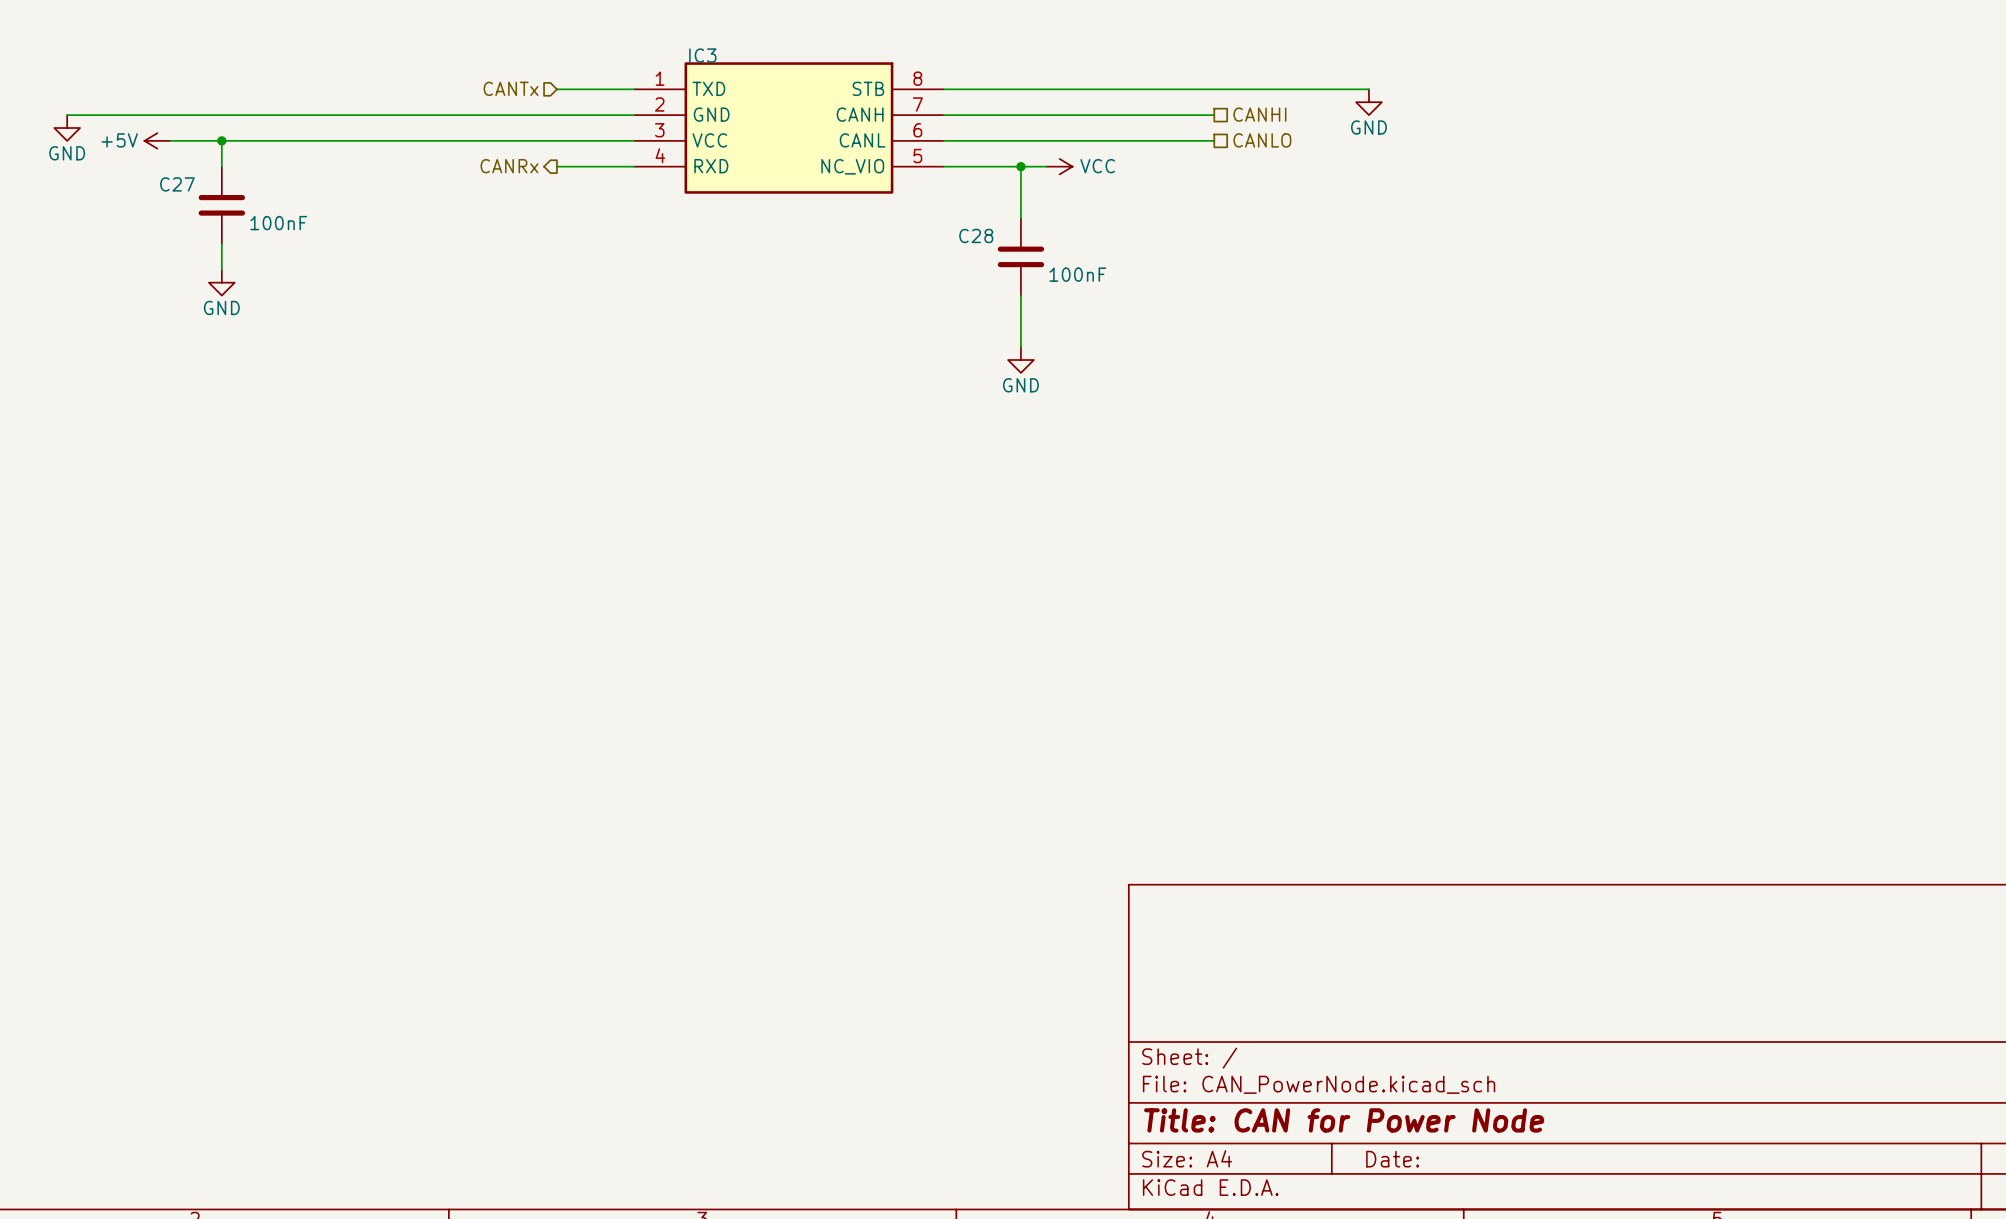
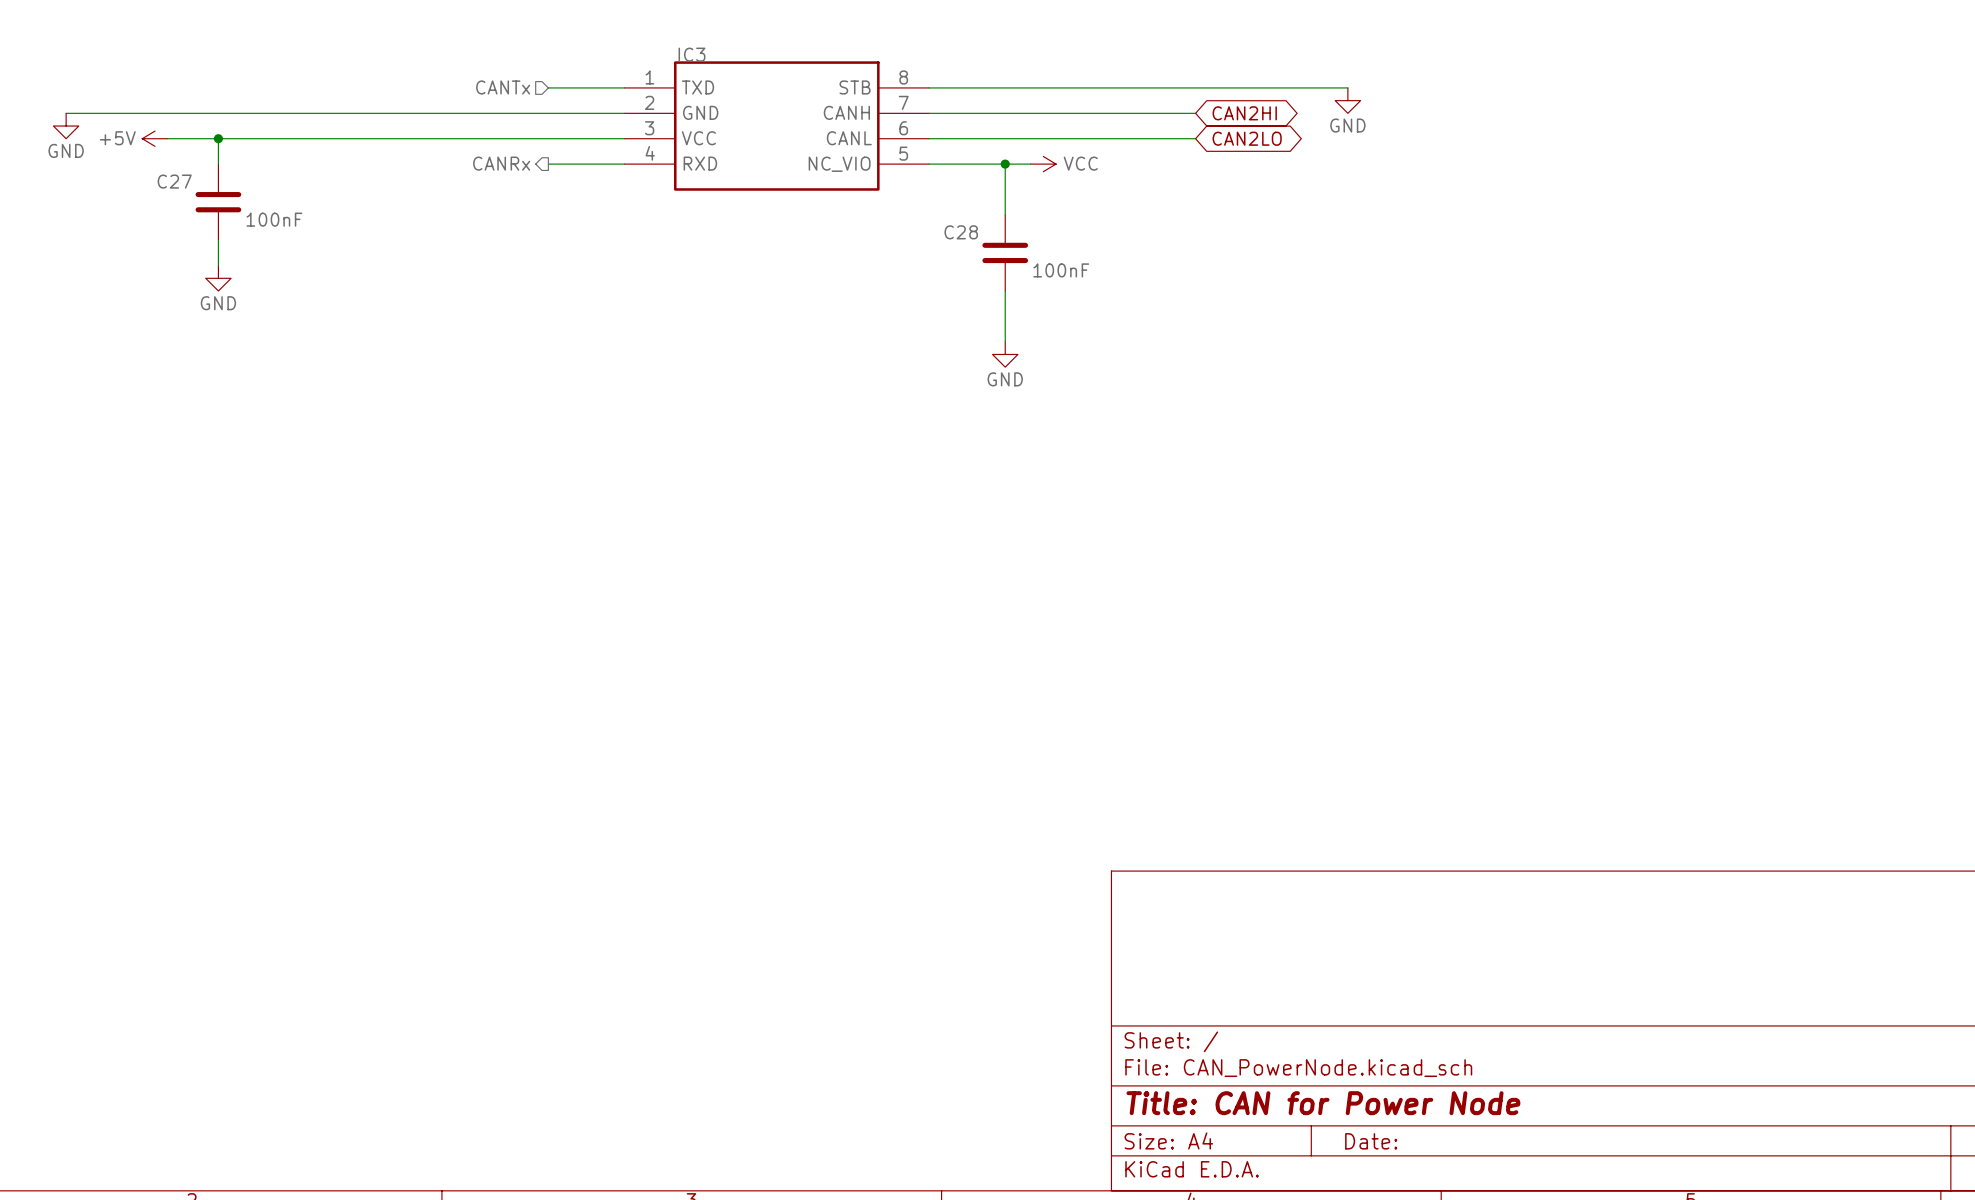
hierarchical label: CANHI (1259, 114) -> none
global label: none -> CAN2HI (1244, 113)
hierarchical label: CANLO (1262, 140) -> none
global label: none -> CAN2LO (1247, 138)

